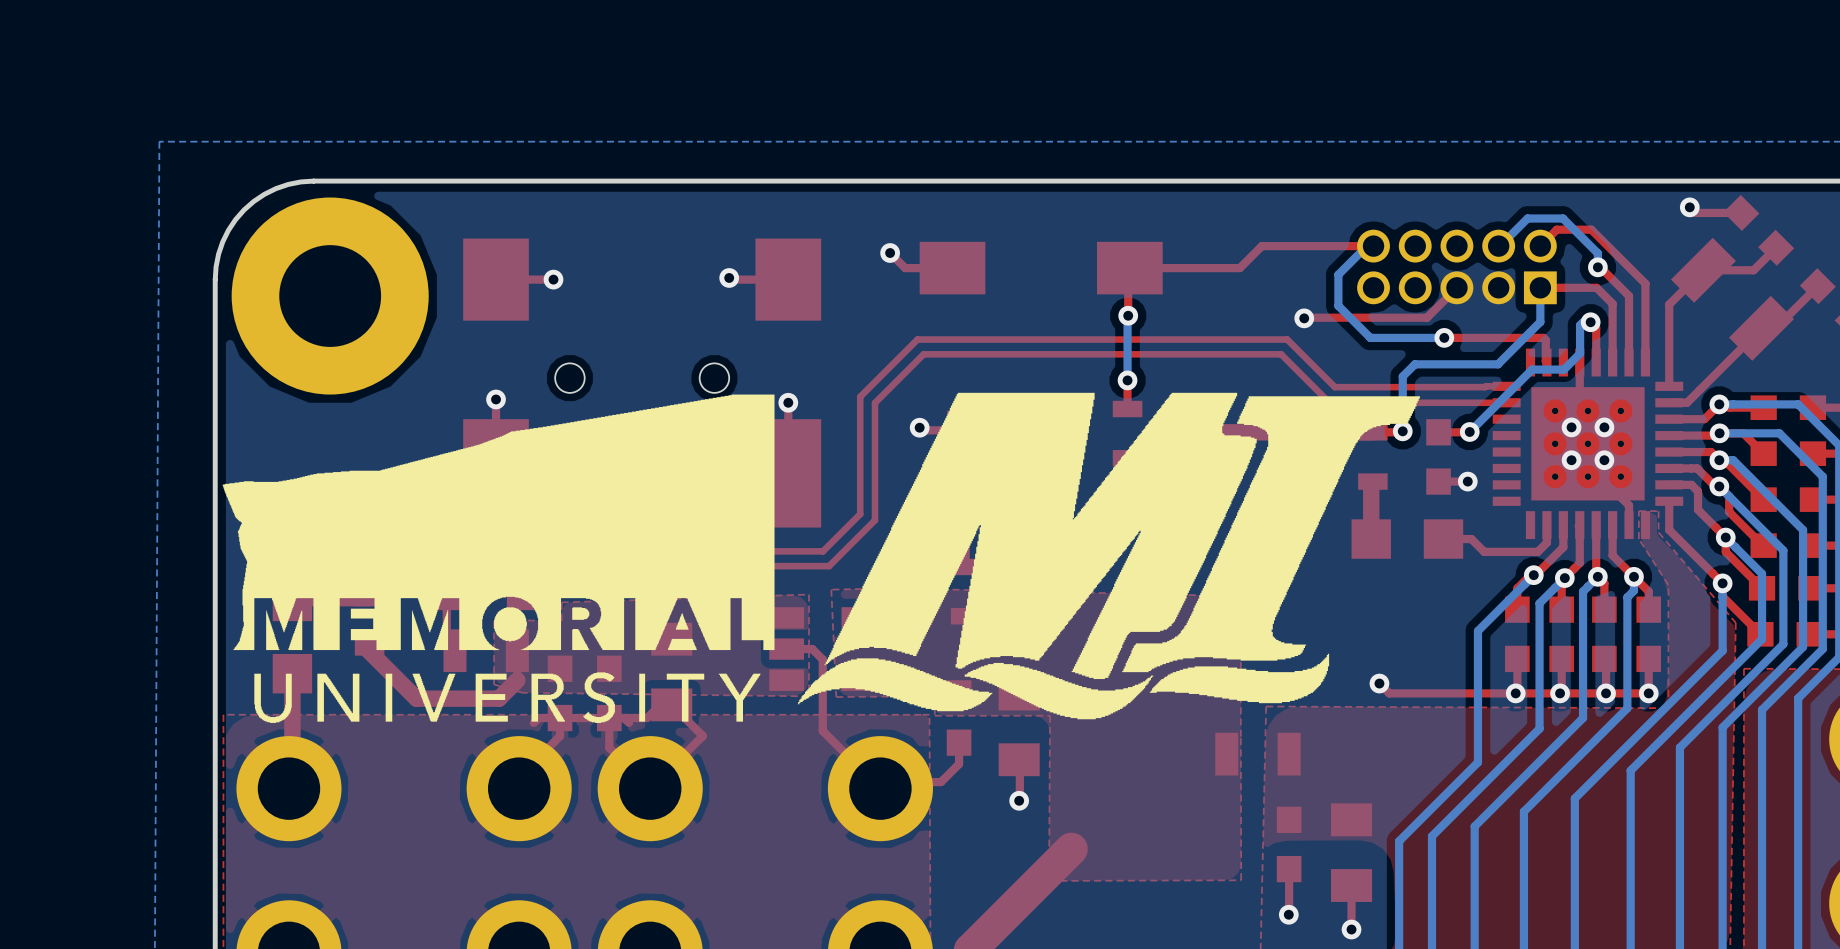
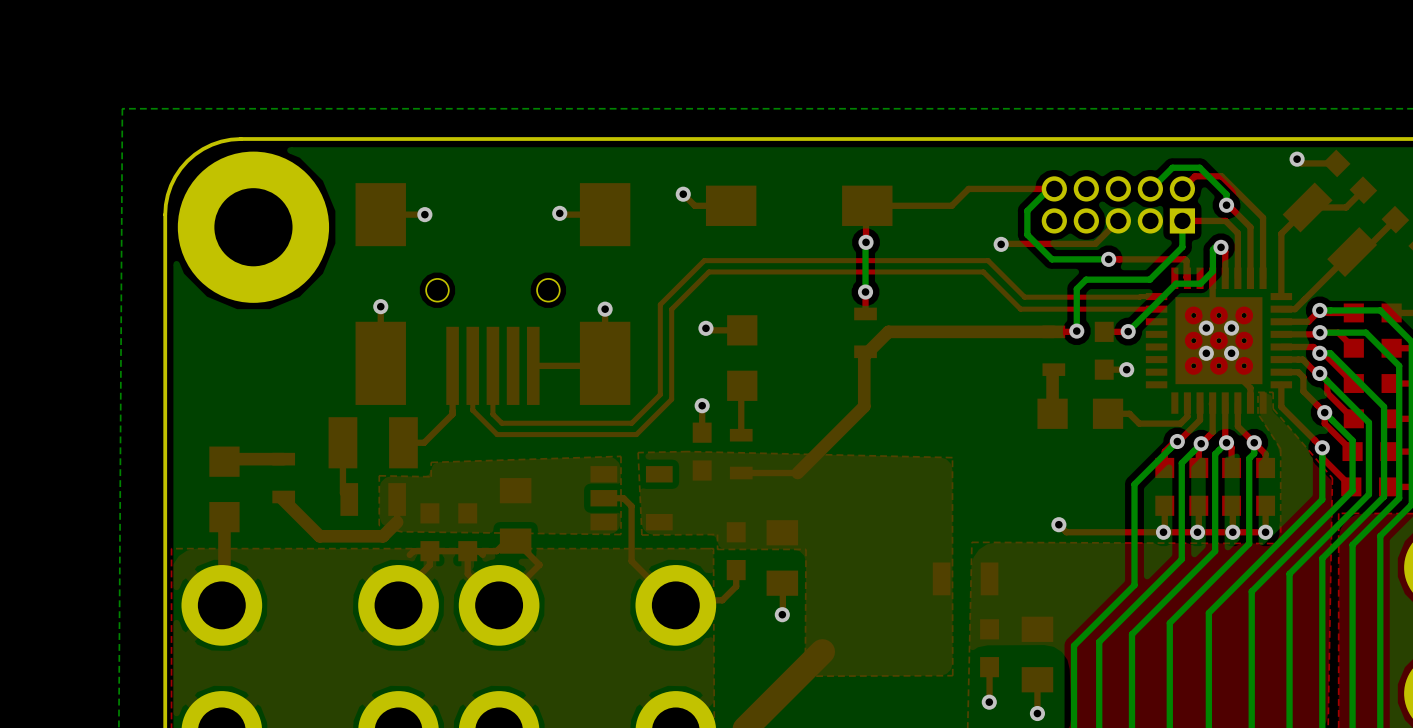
drawing: [222, 392, 1420, 723] -> none

